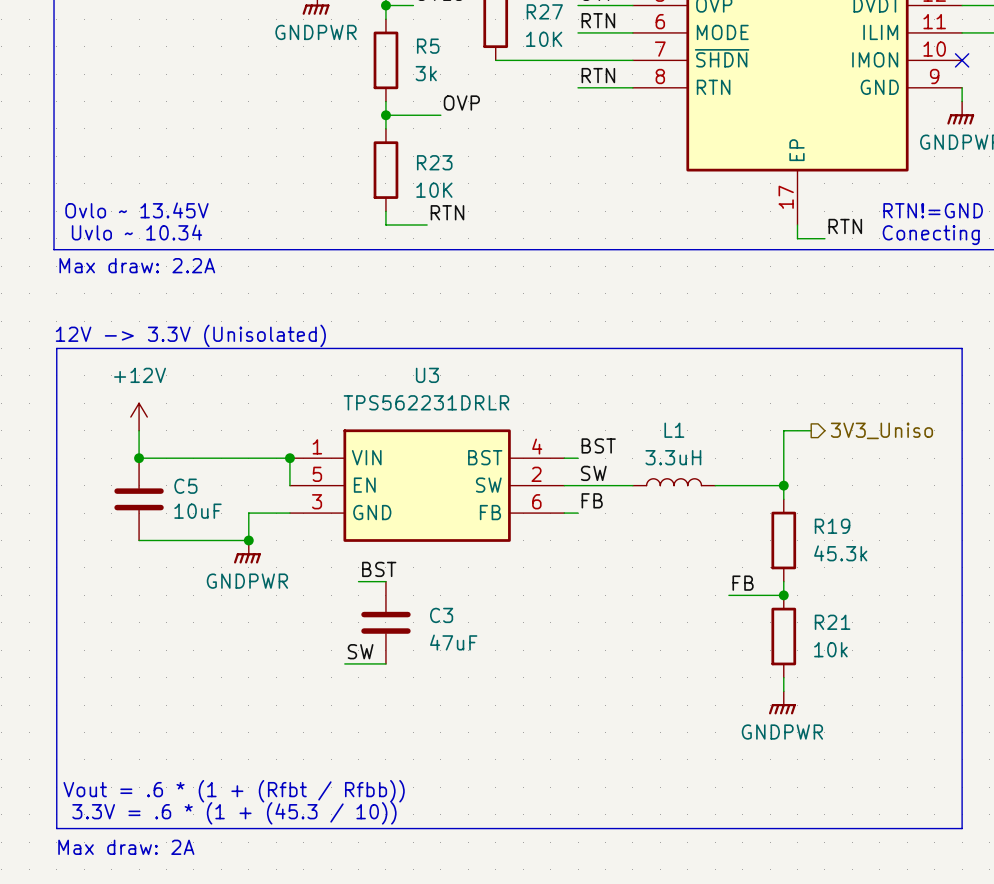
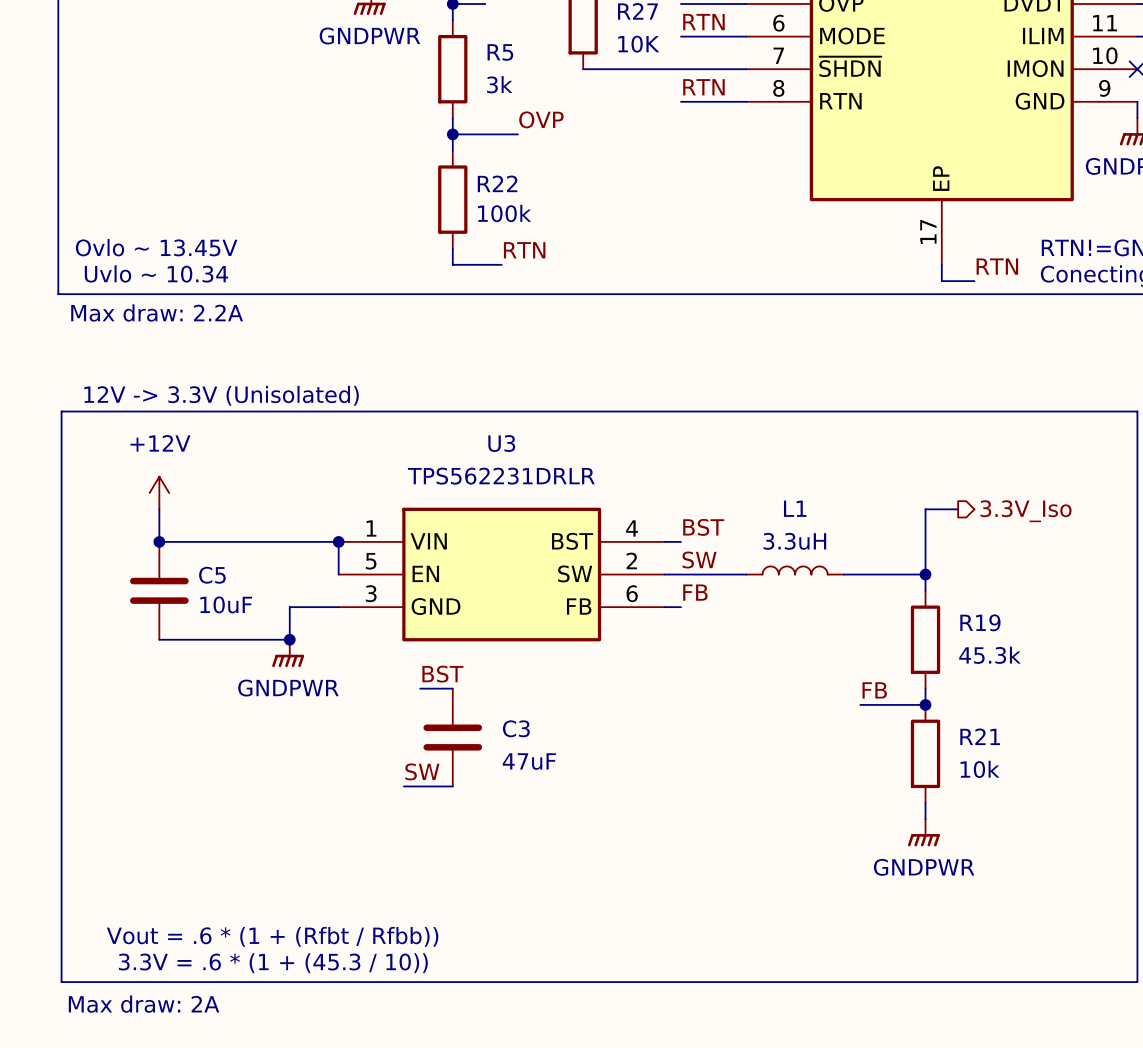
R23 name: R23 (434, 162) -> R22 (497, 183)
R23 value: 10K (434, 190) -> 100k (504, 213)
hierarchical label: 3V3_Uniso (881, 430) -> 3.3V_Iso (1026, 511)

